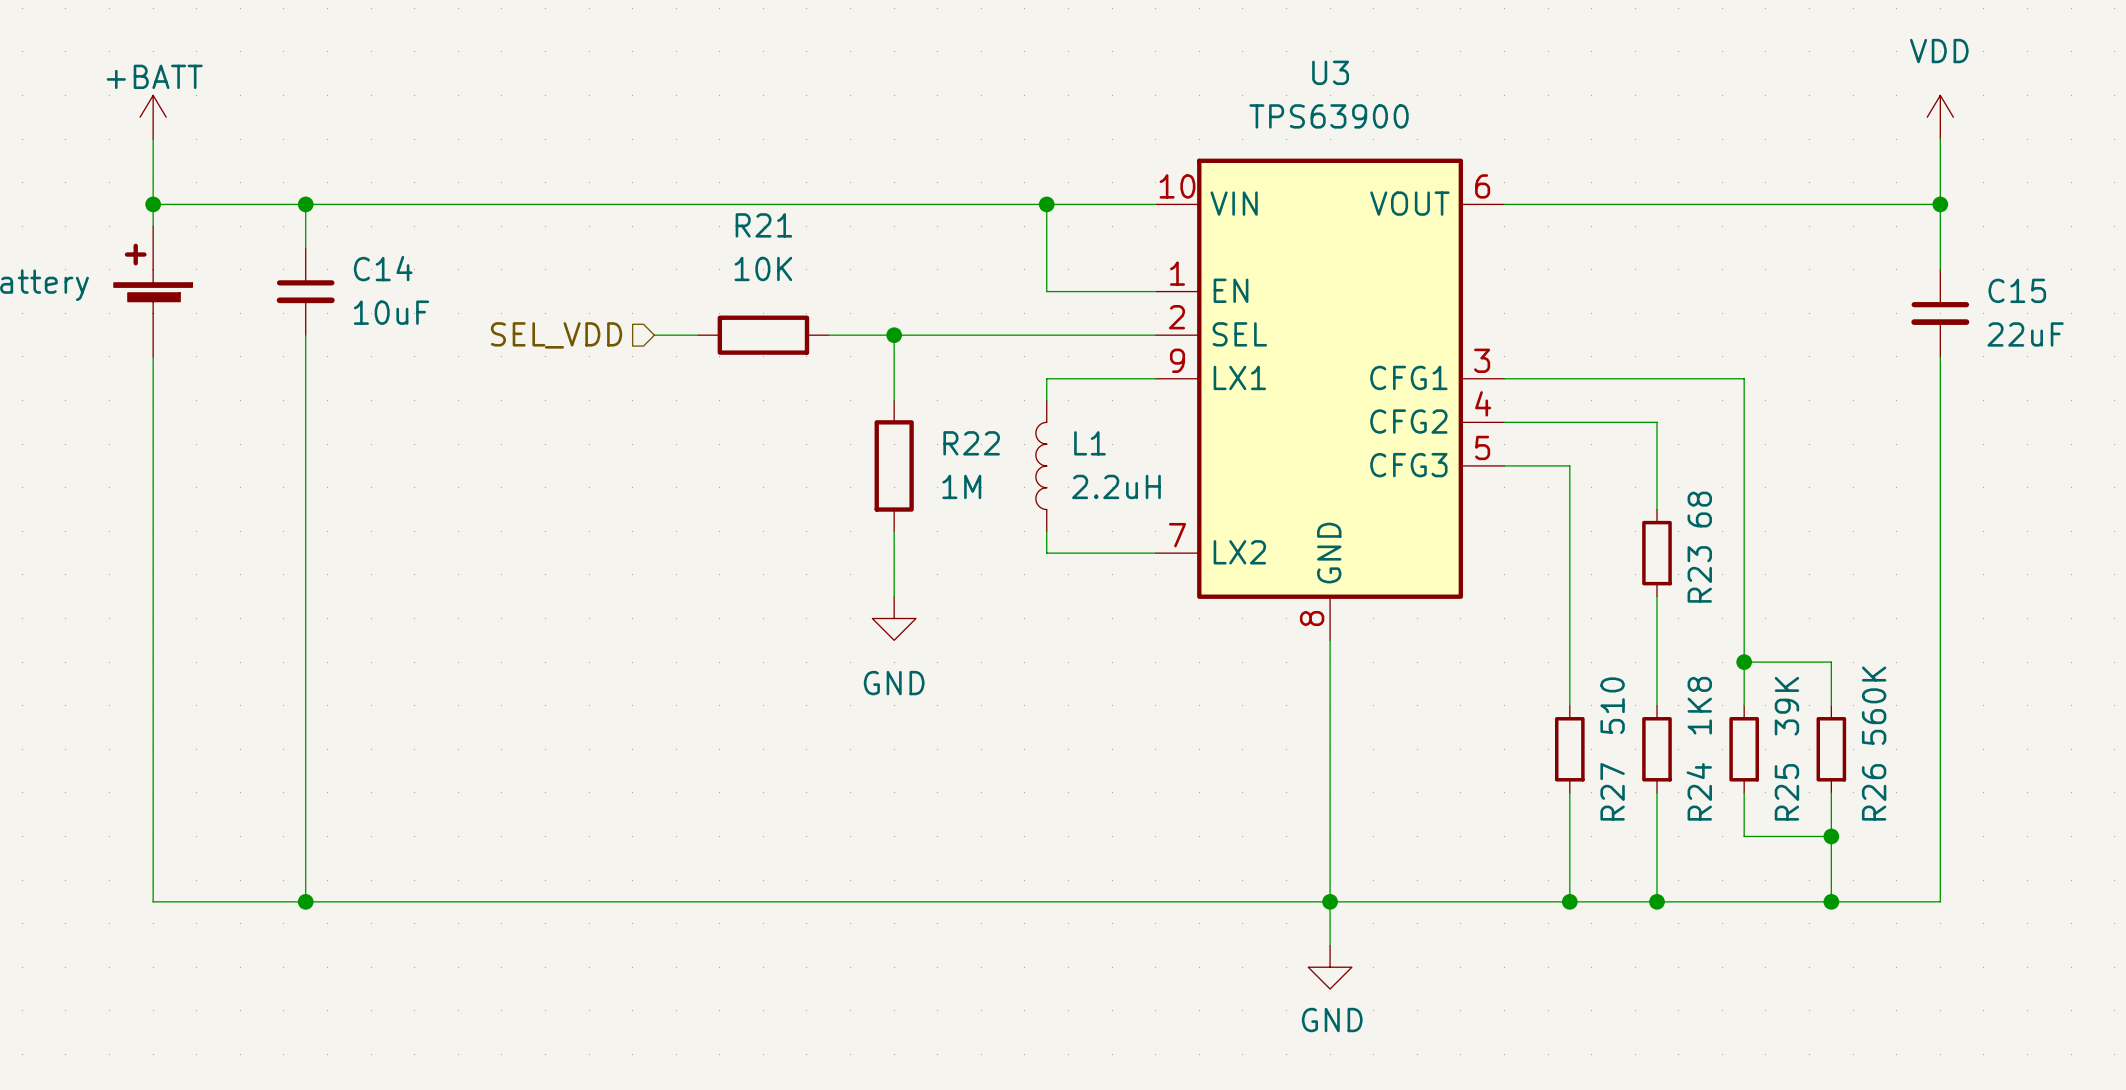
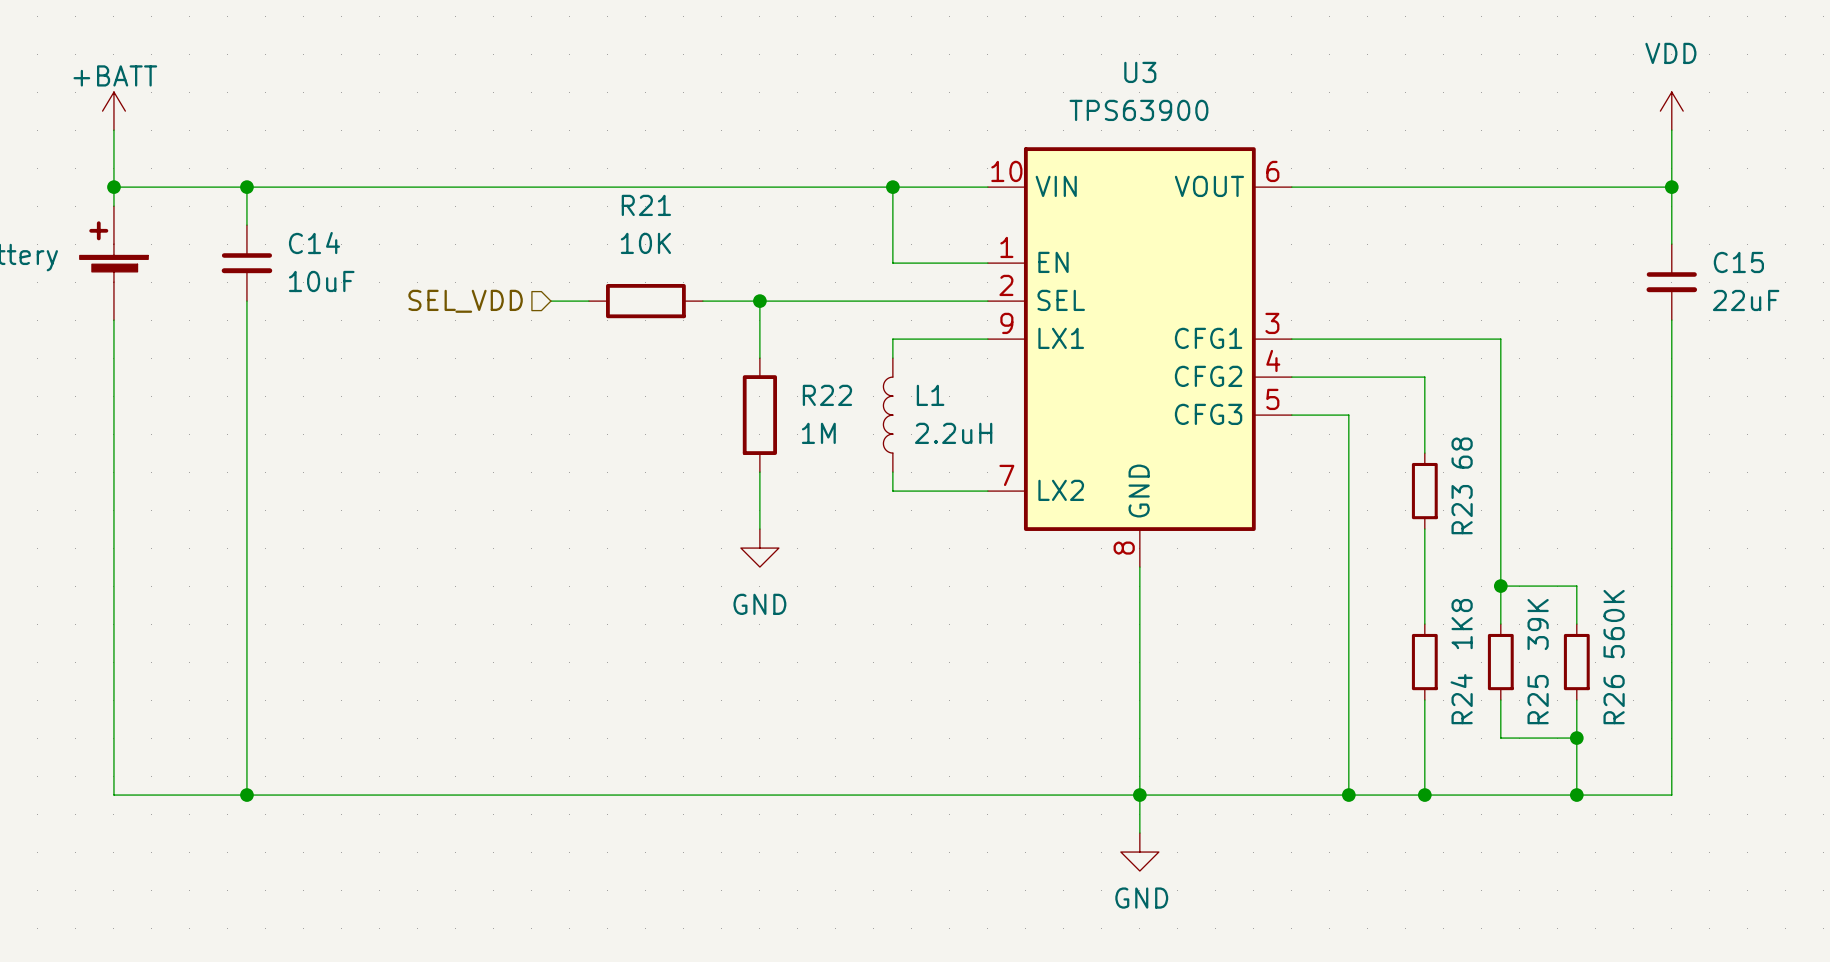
wire: none -> (1348, 624) (1348, 700)
R27: 510 (1569, 749) -> none

